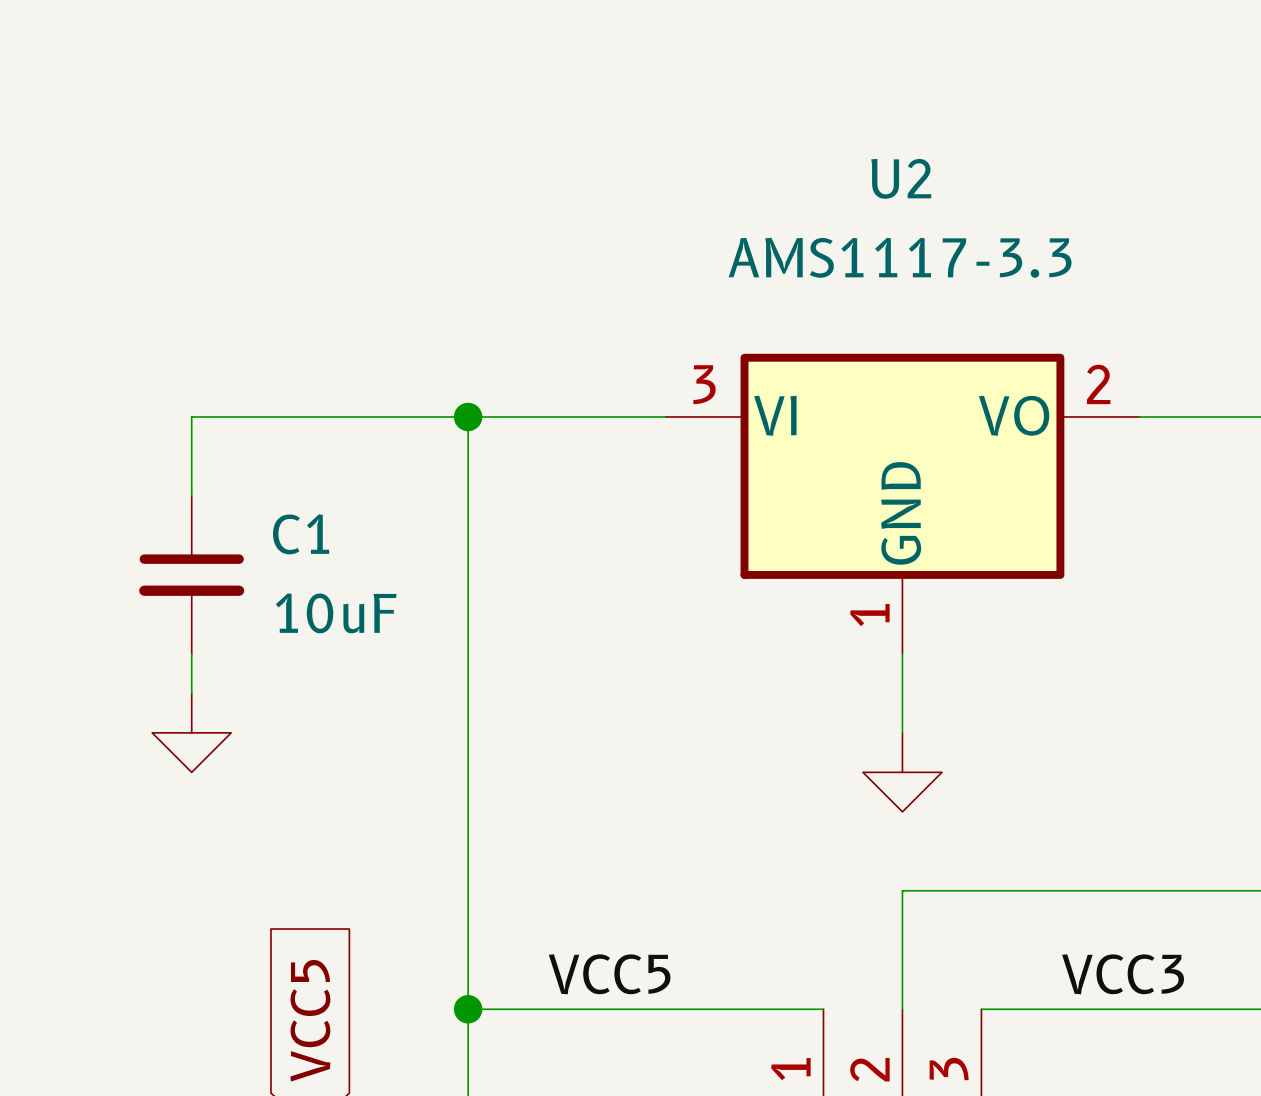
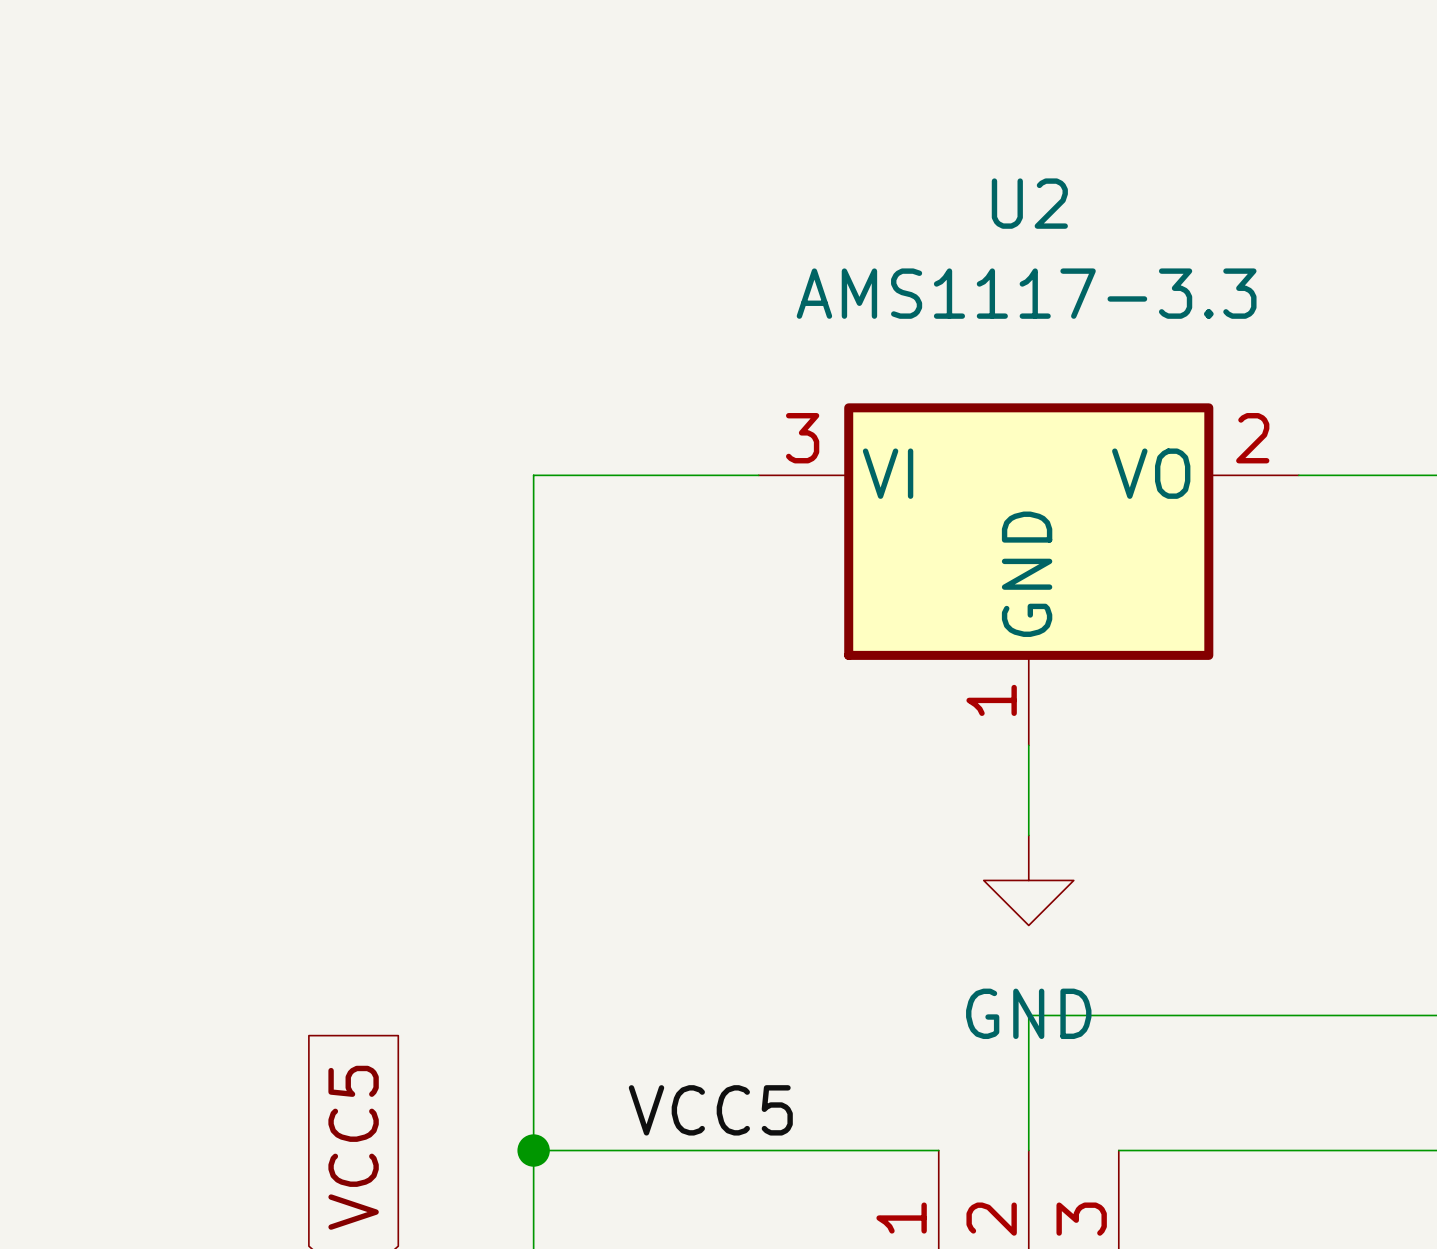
wire: (468, 416) (191, 416) (191, 495) -> none
junction: (468, 416) -> none
C1: 10uF (191, 574) -> none
wire: (191, 653) (191, 693) -> none
power symbol: (191, 732) -> none
power symbol text: none -> GND (1028, 1013)
label: VCC3 (1123, 974) -> none

